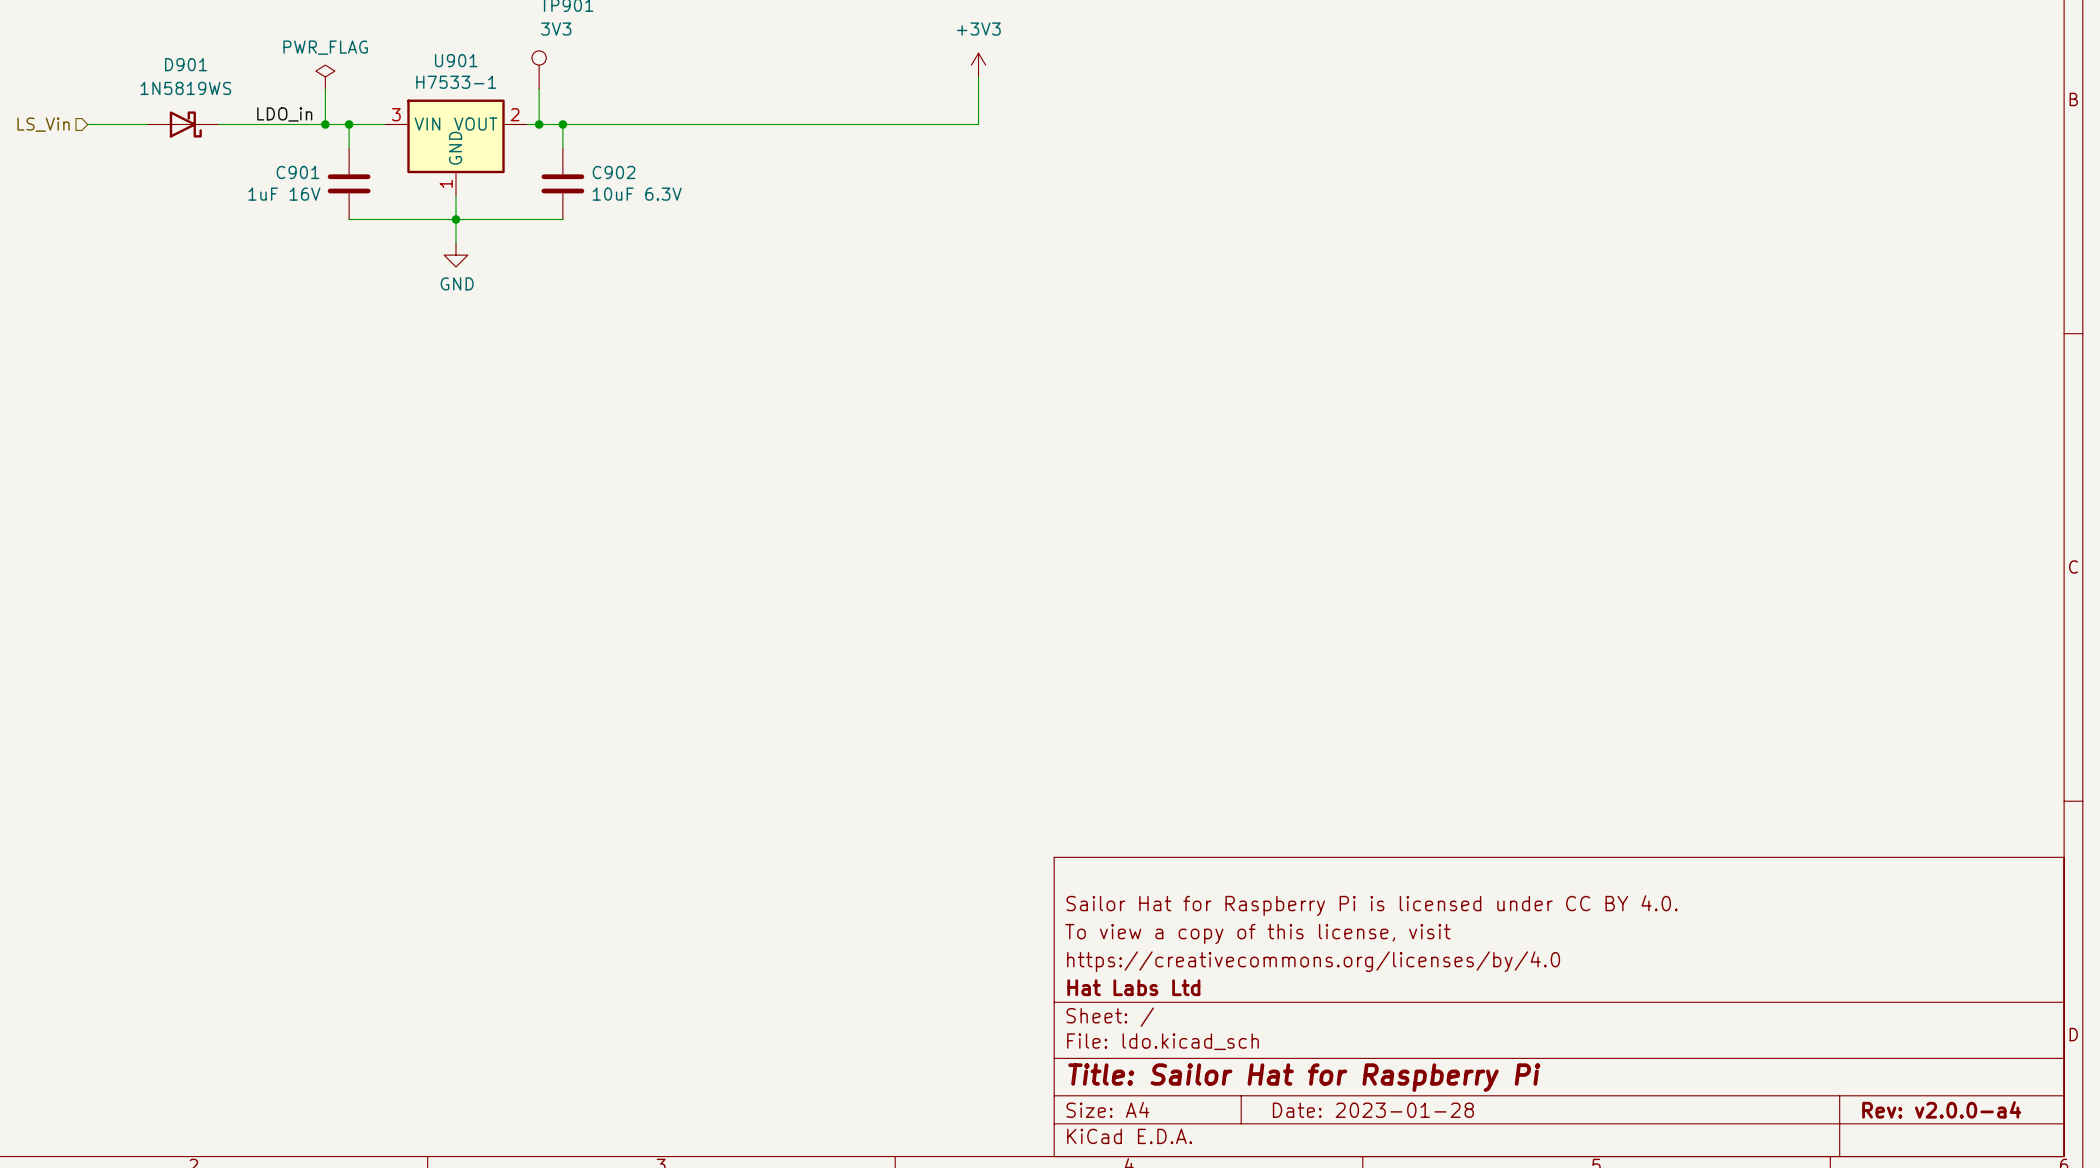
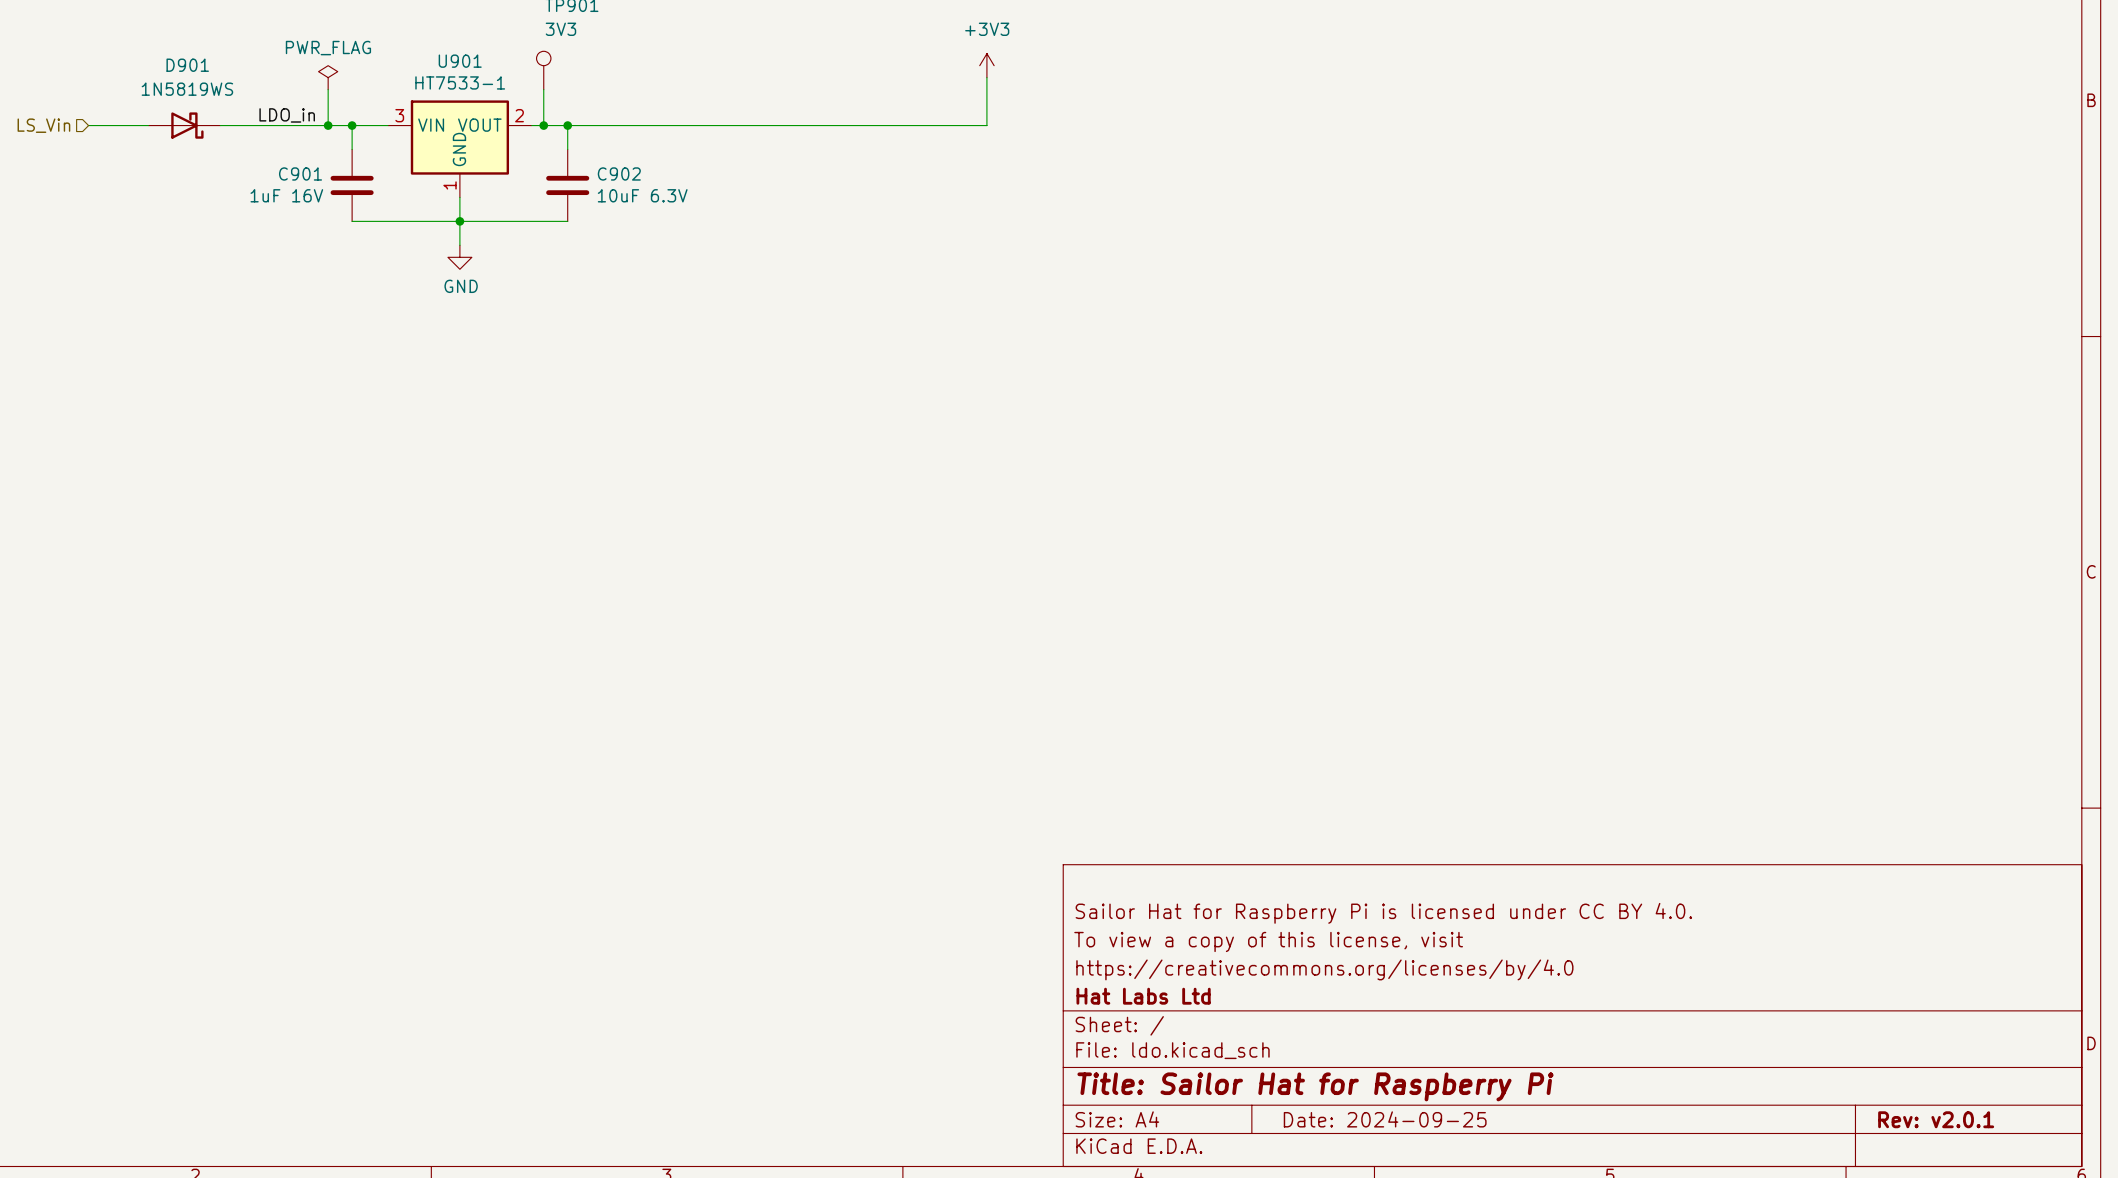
U901 value: H7533-1 (456, 82) -> HT7533-1 (460, 82)
title block: Rev: v2.0.0-a4 (1941, 1109) -> Rev: v2.0.1 (1936, 1119)
title block: Date: 2023-01-28 (1373, 1110) -> Date: 2024-09-25 (1385, 1119)

